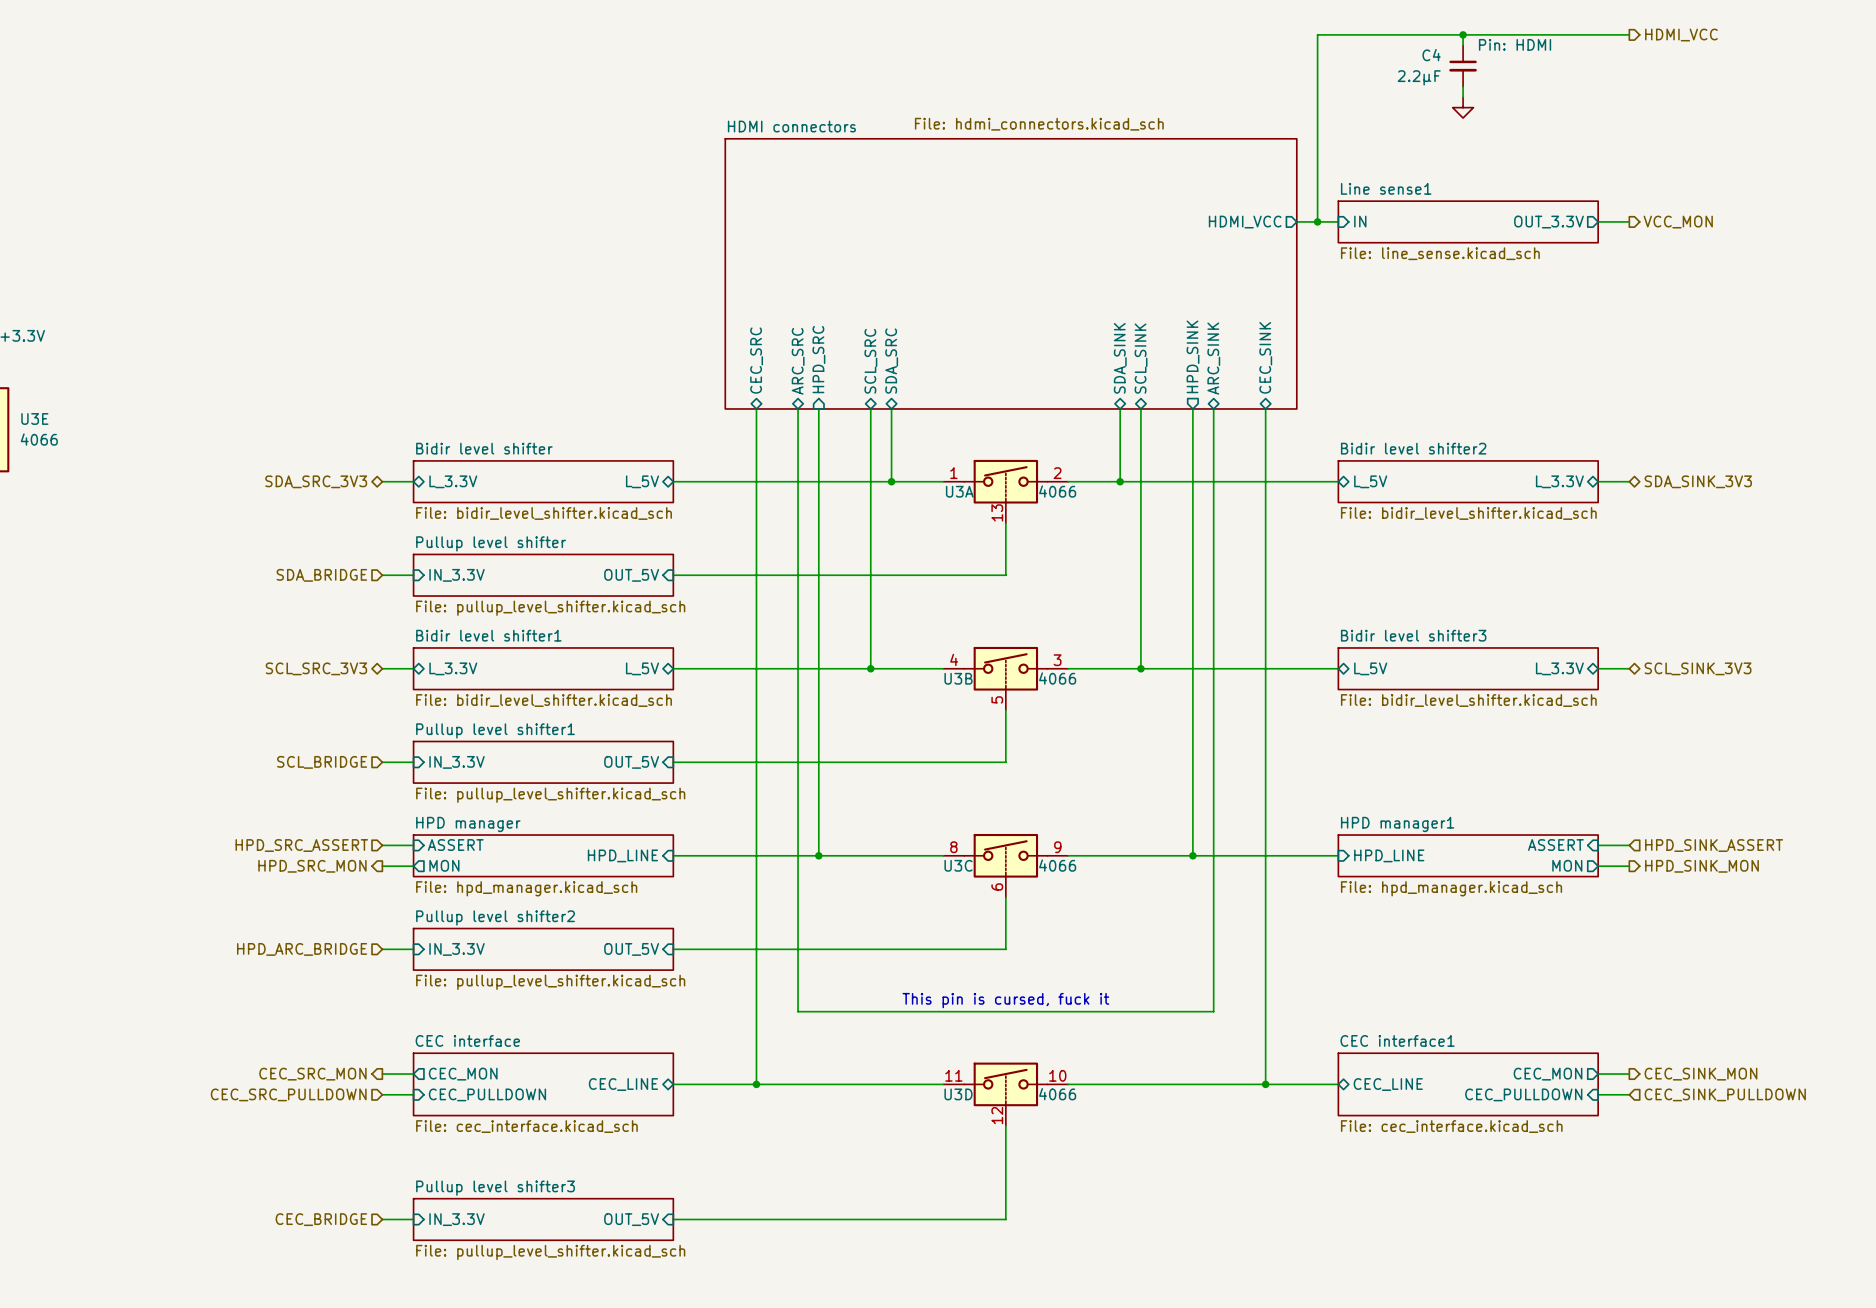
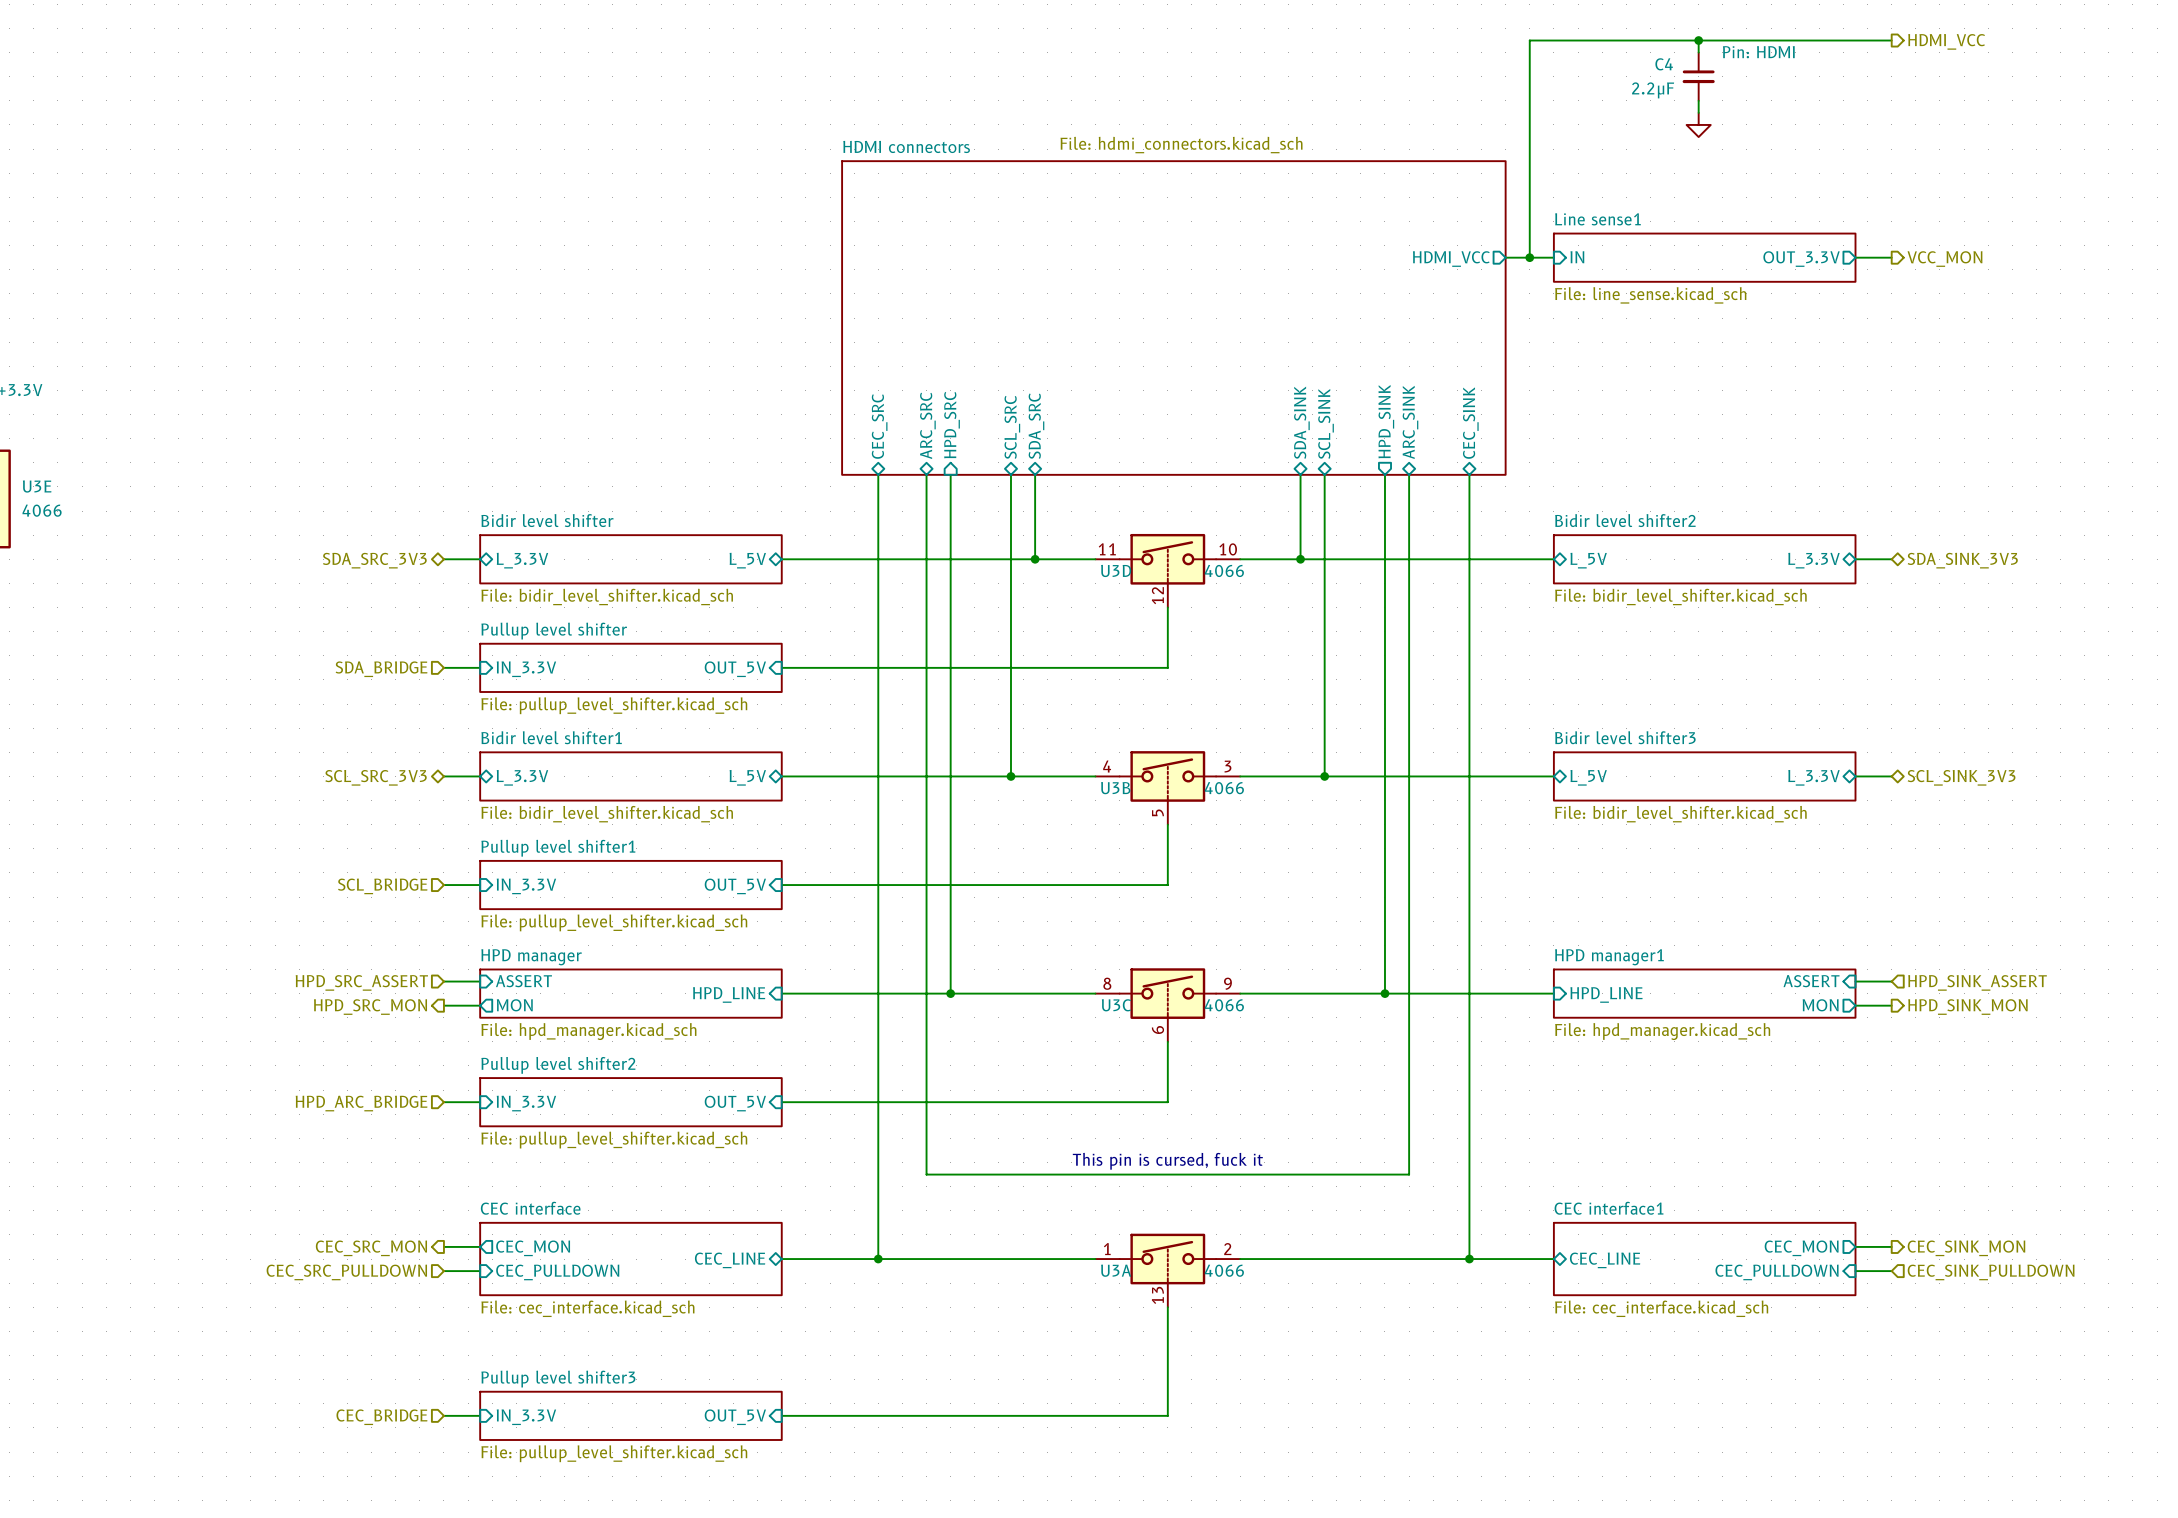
U3A position: (1005, 491) -> (1167, 1270)
U3D position: (1005, 1094) -> (1167, 570)

